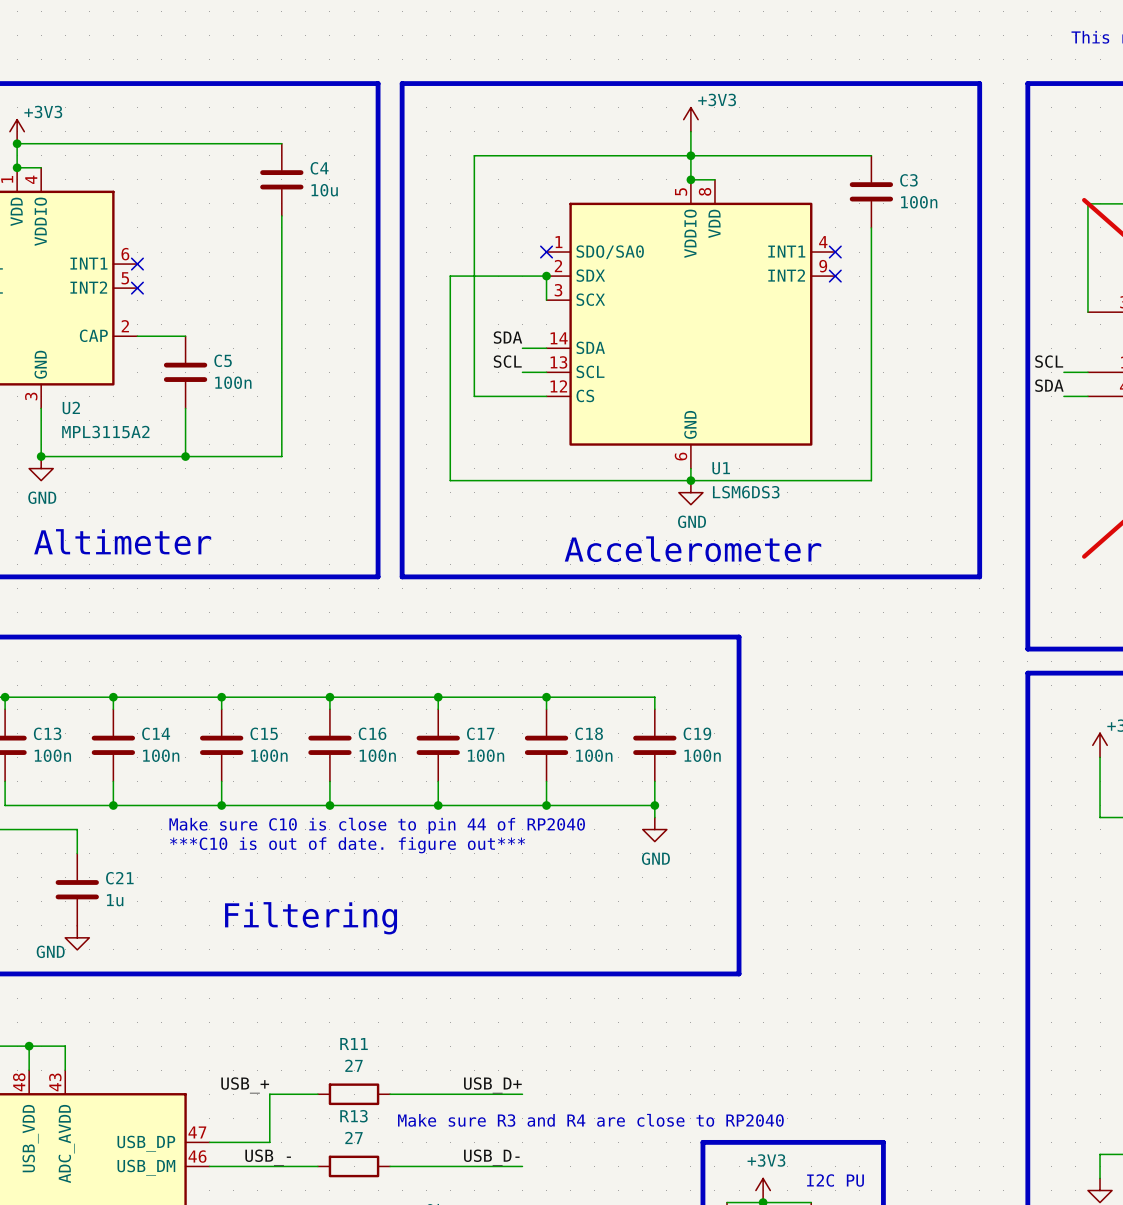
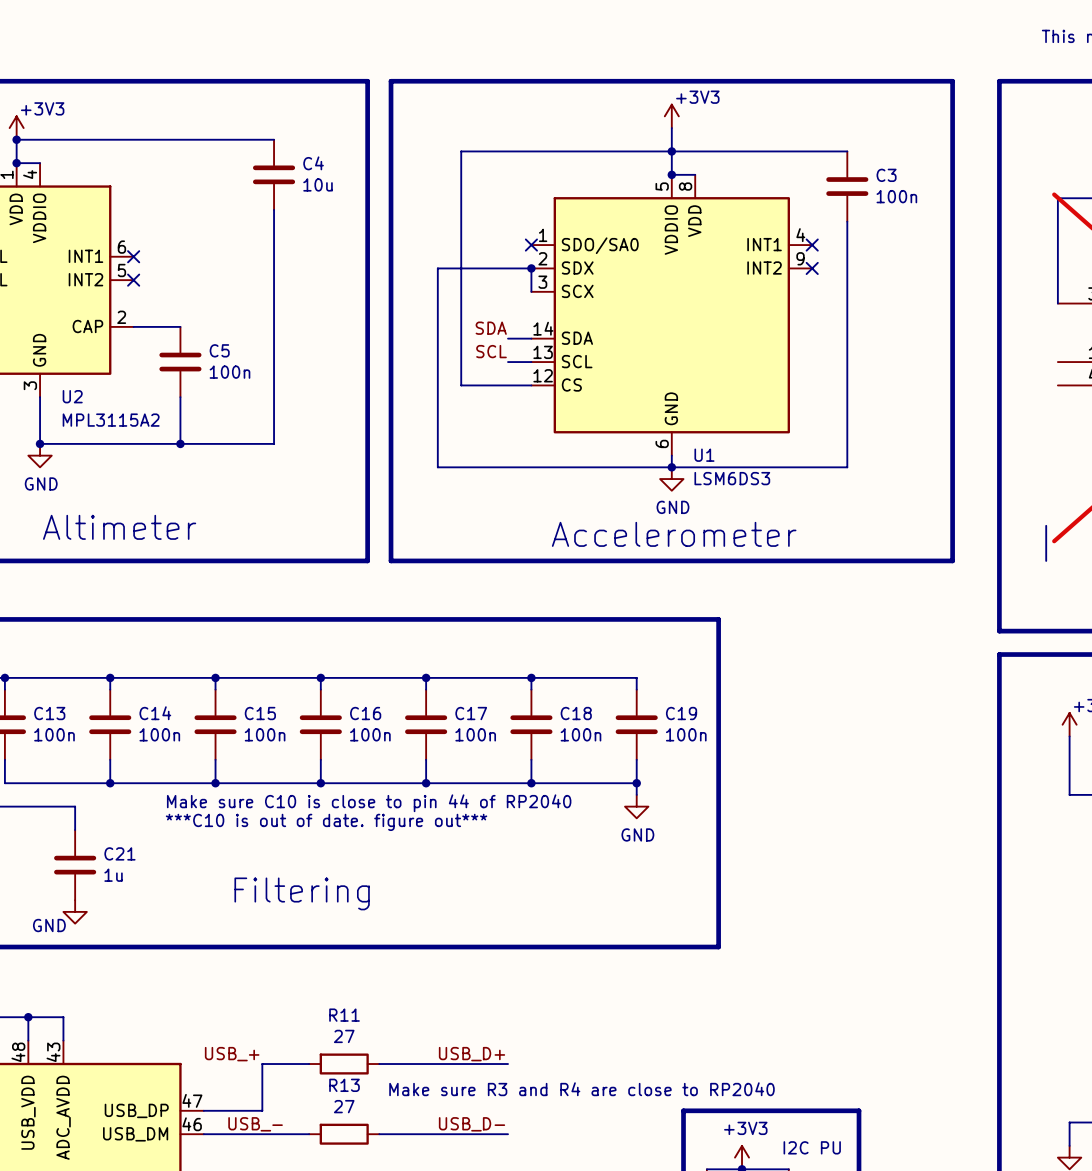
label: SCL (1049, 361) -> none
wire: (1063, 372) (1087, 372) -> none
label: SDA (1049, 385) -> none
wire: (1063, 396) (1087, 396) -> none
wire: none -> (1046, 525) (1046, 560)

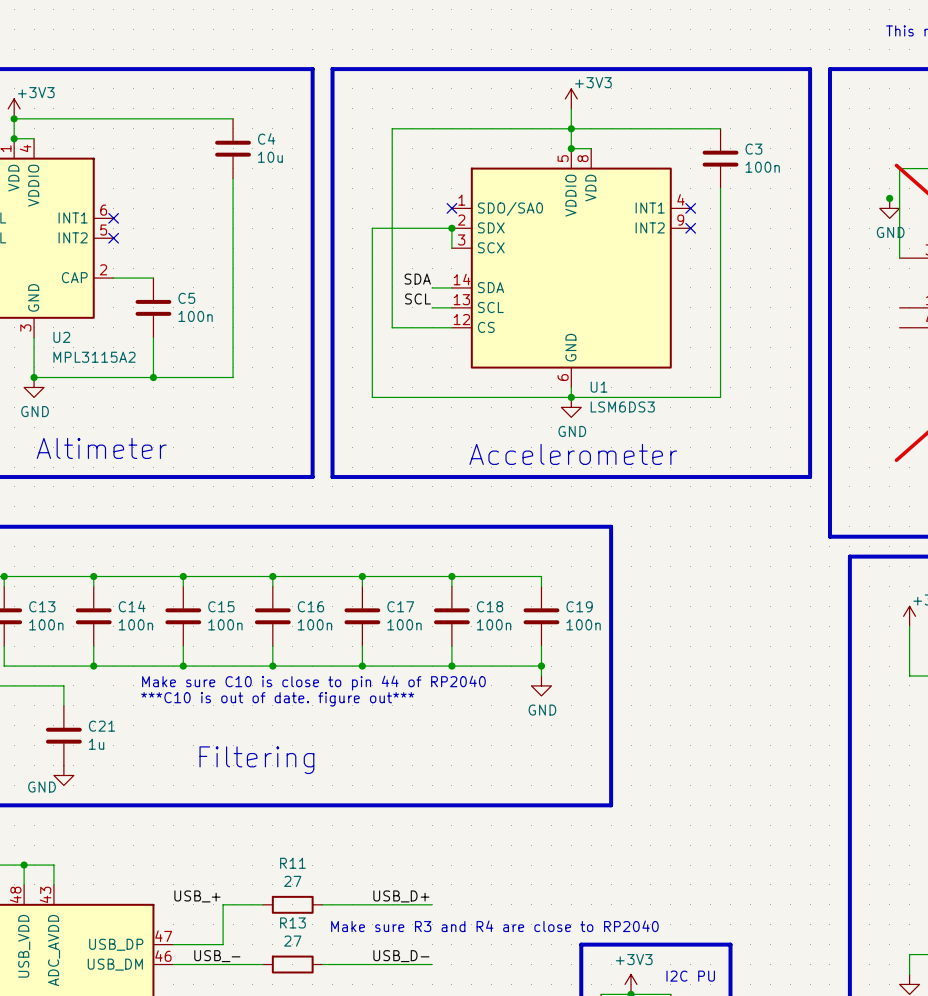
line: (999, 81) (999, 631) -> (849, 69) (829, 69) (829, 536) (849, 536)
junction: none -> (889, 198)
power symbol: none -> GND (889, 208)
wire: (1046, 525) (1046, 560) -> none

